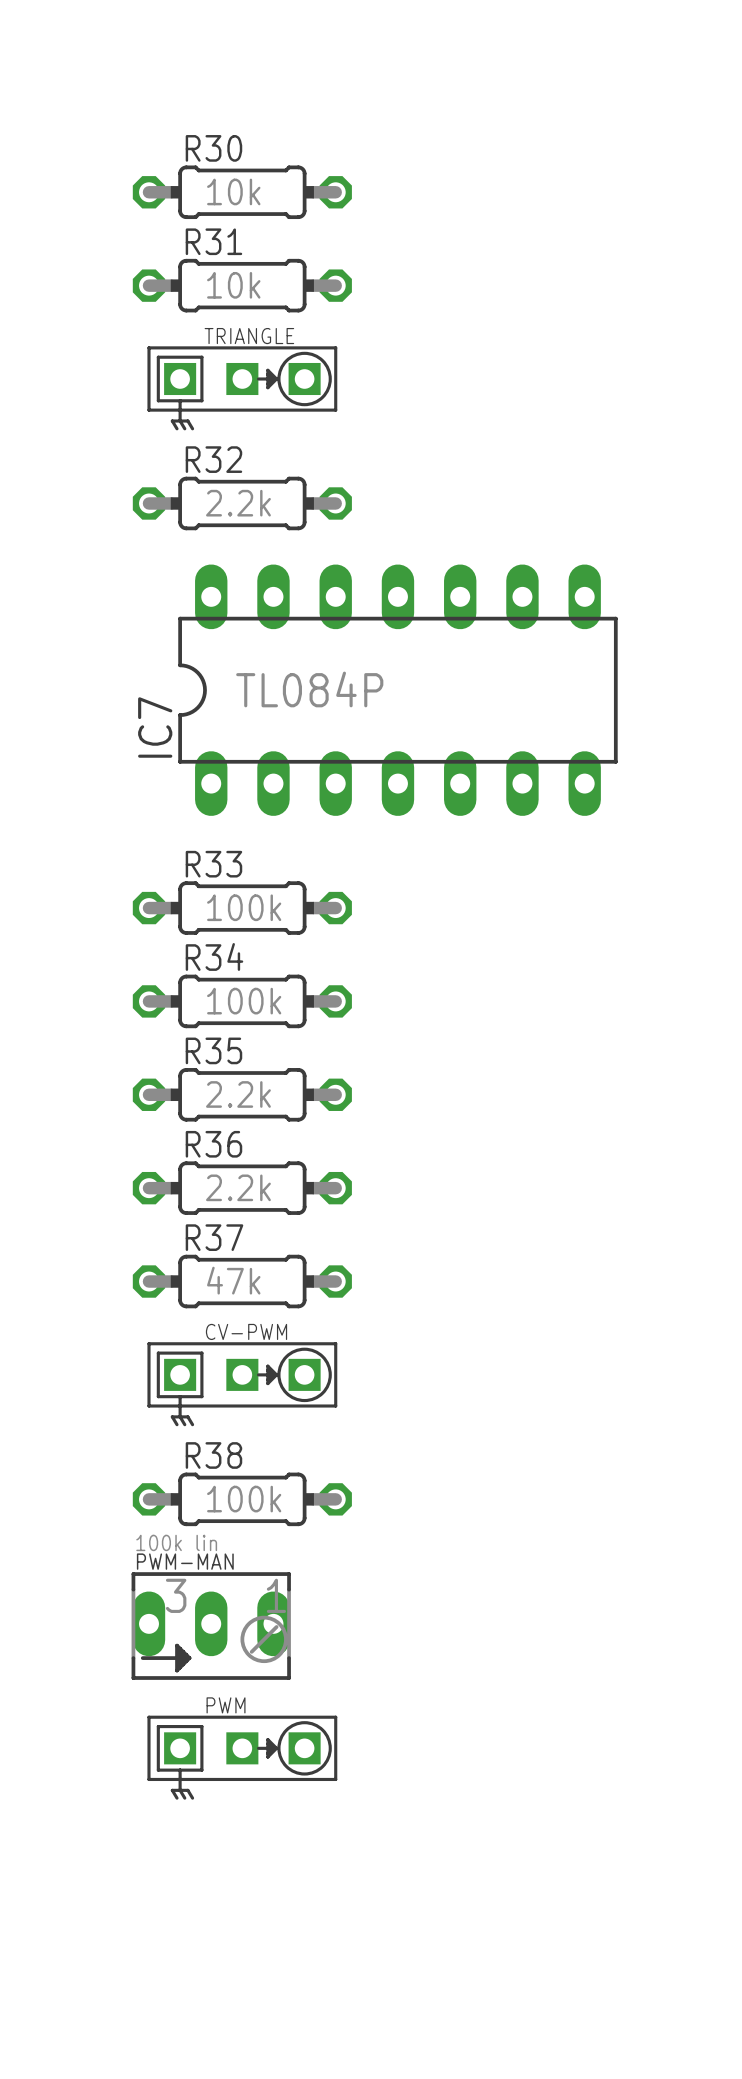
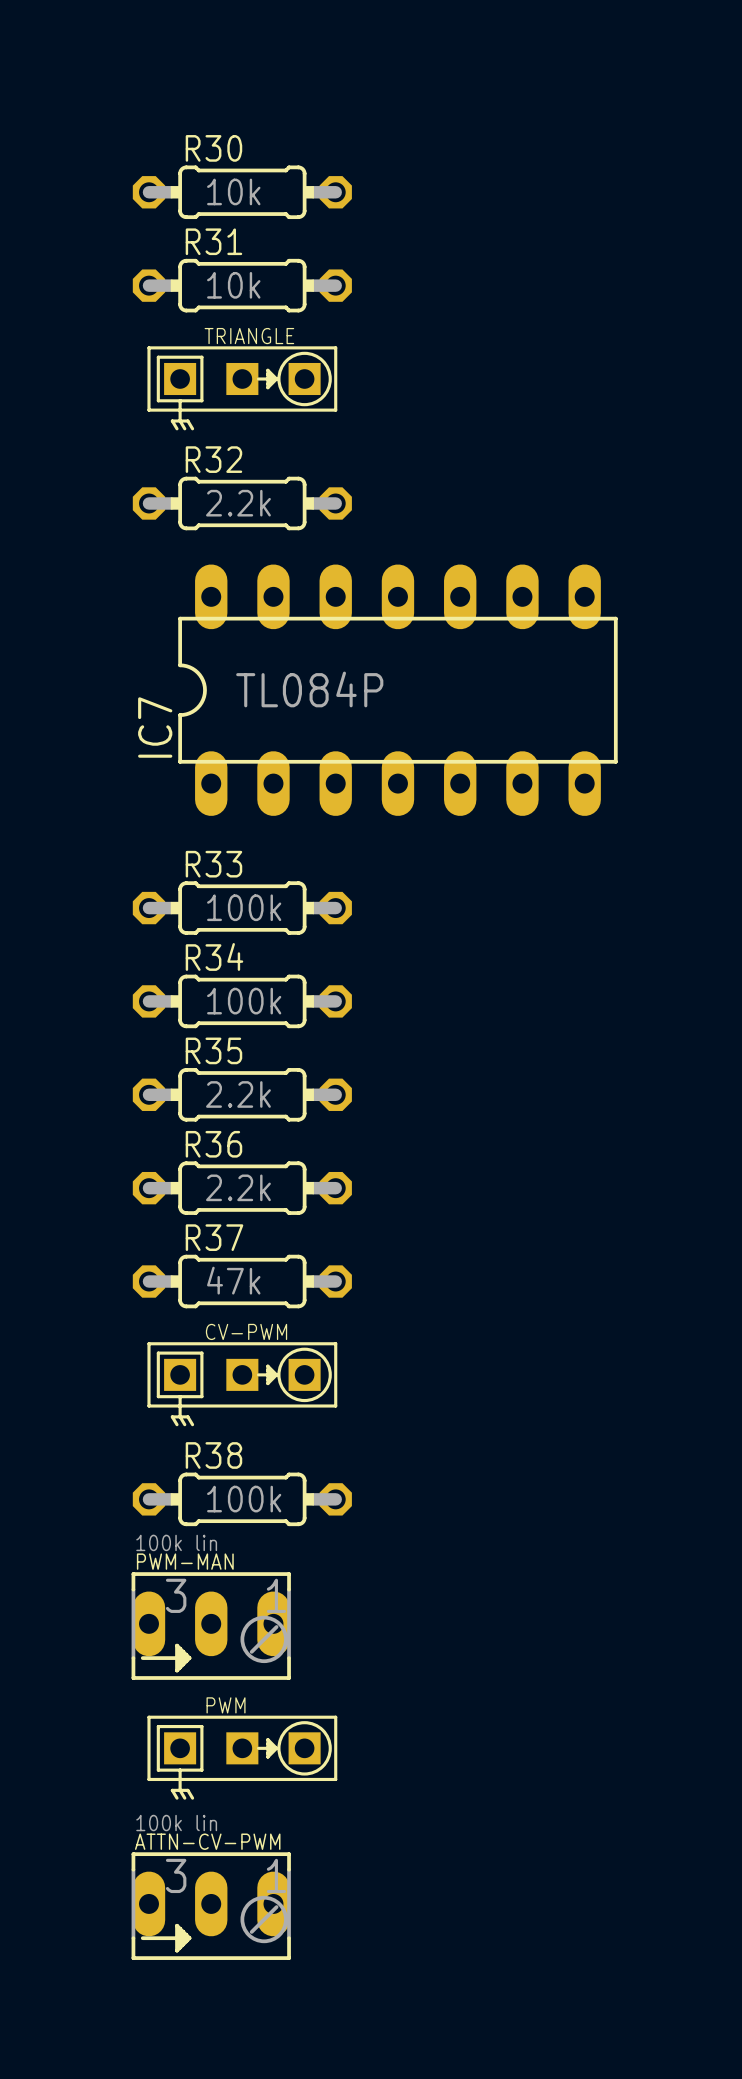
ATTN-CV-PWM: none -> 100k lin (211, 1906)

